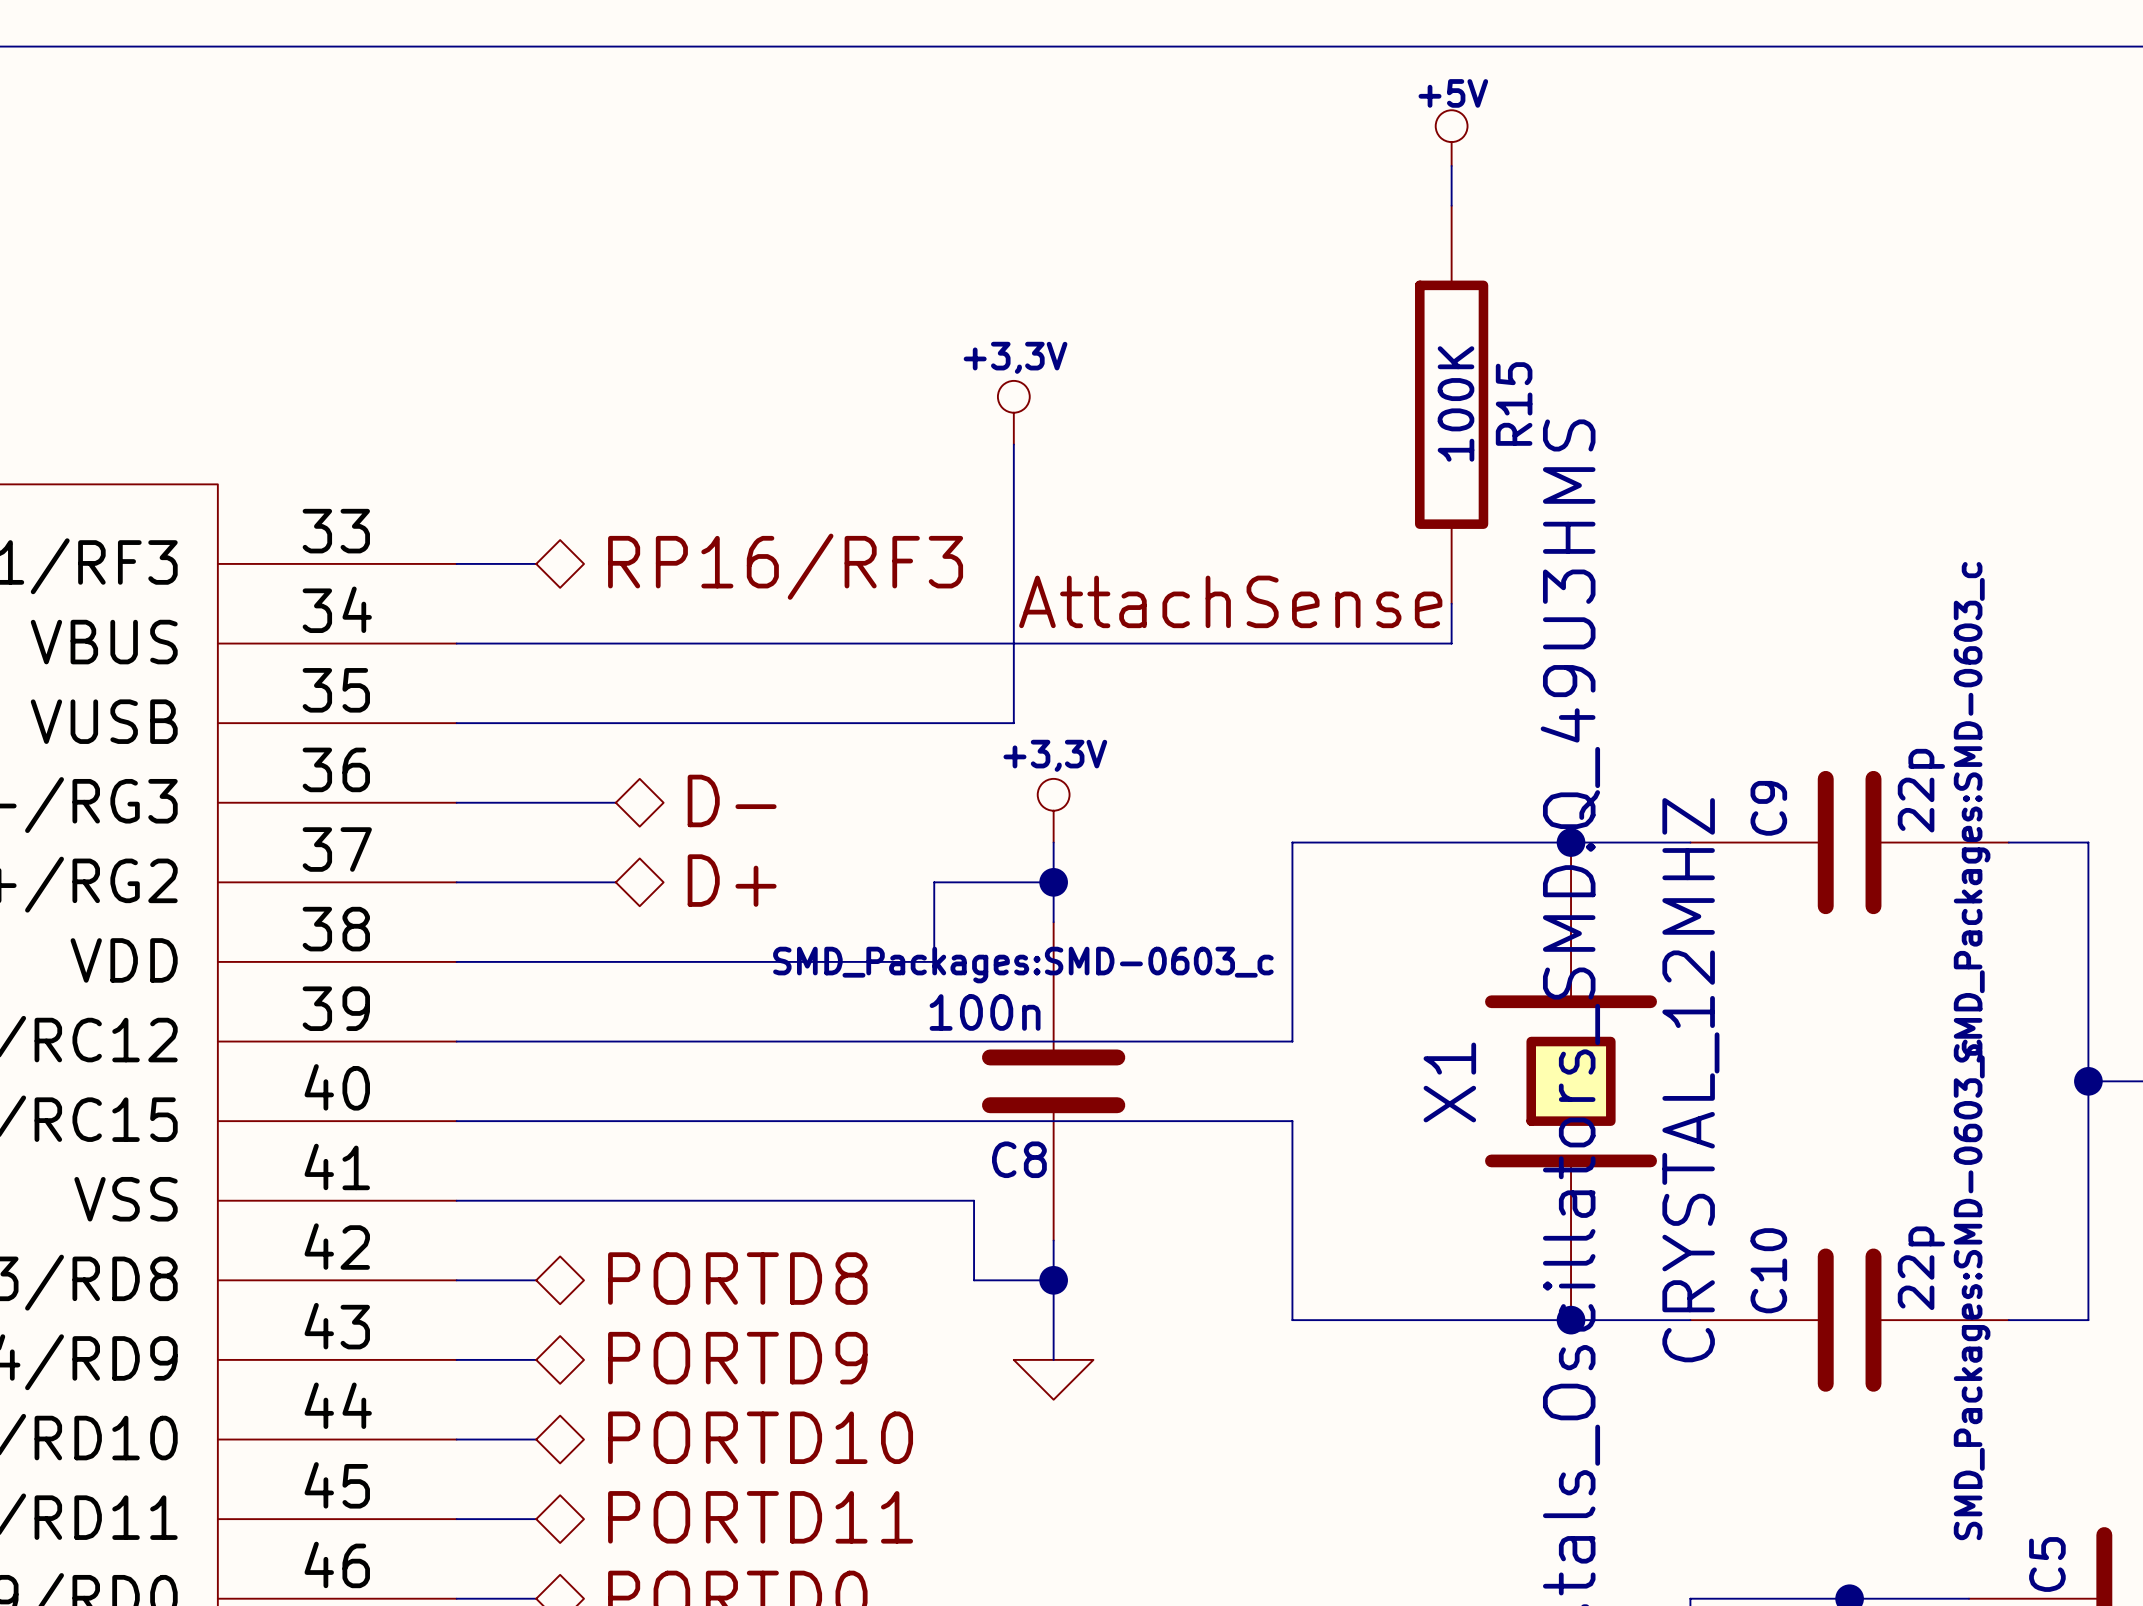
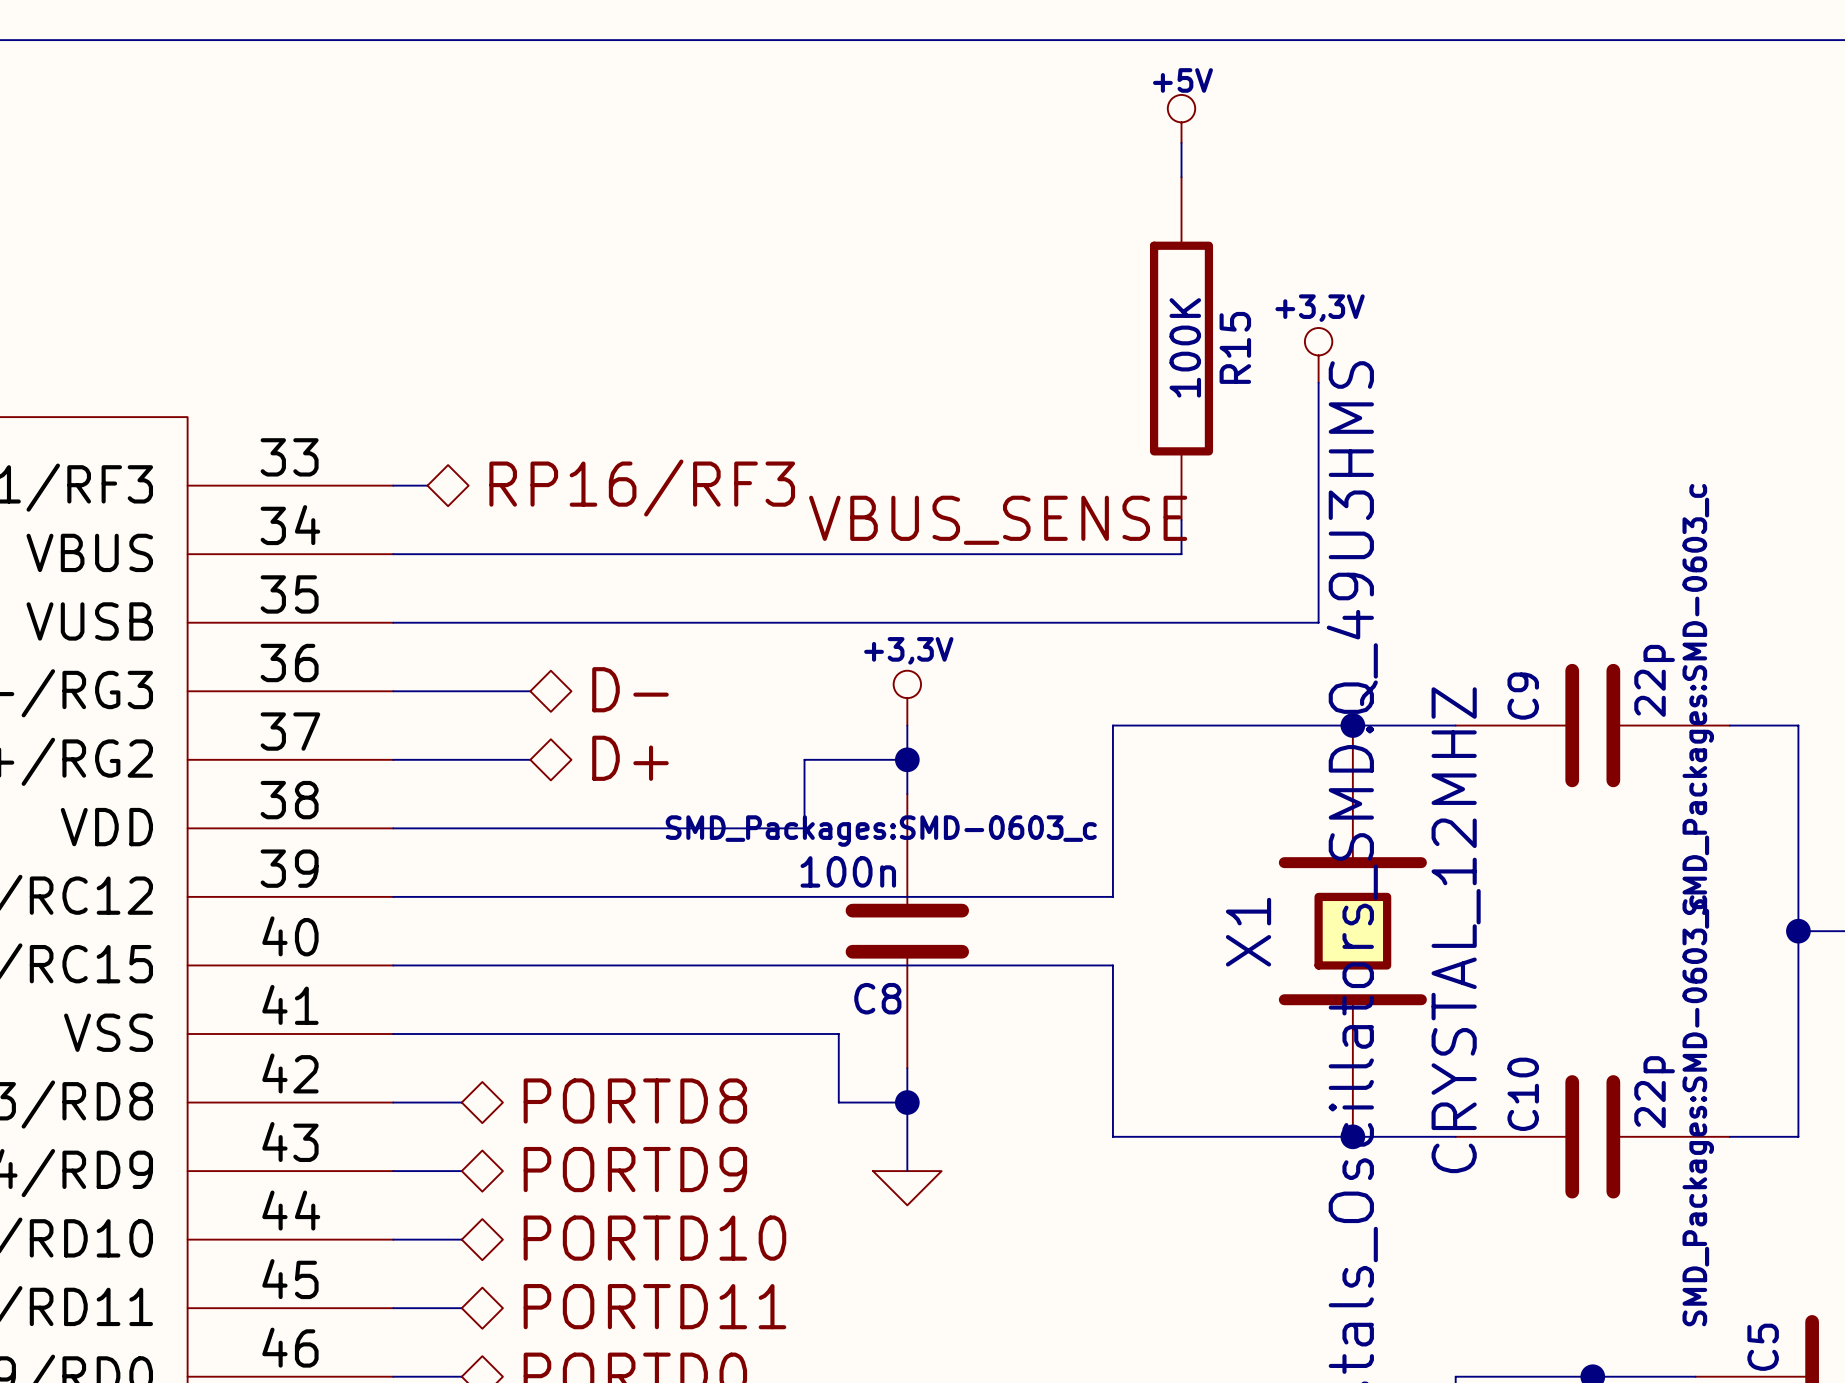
power symbol position: +5V (1451, 138) -> +5V (1181, 118)
wire: (1451, 165) (1451, 205) -> (1181, 142) (1181, 177)
R15 position: (1451, 404) -> (1181, 348)
power symbol position: +3,3V (1013, 412) -> +3,3V (1318, 355)
wire: (1013, 444) (1013, 723) -> (1318, 382) (1318, 622) (873, 622)
wire: (496, 563) (536, 563) -> none
hierarchical label position: RP16/RF3 (785, 566) -> RP16/RF3 (642, 488)
label: AttachSense (1230, 601) -> none
wire: (1451, 603) (1451, 643) (1372, 643) -> (1181, 519) (1181, 554)
label: none -> VBUS_SENSE (998, 520)

